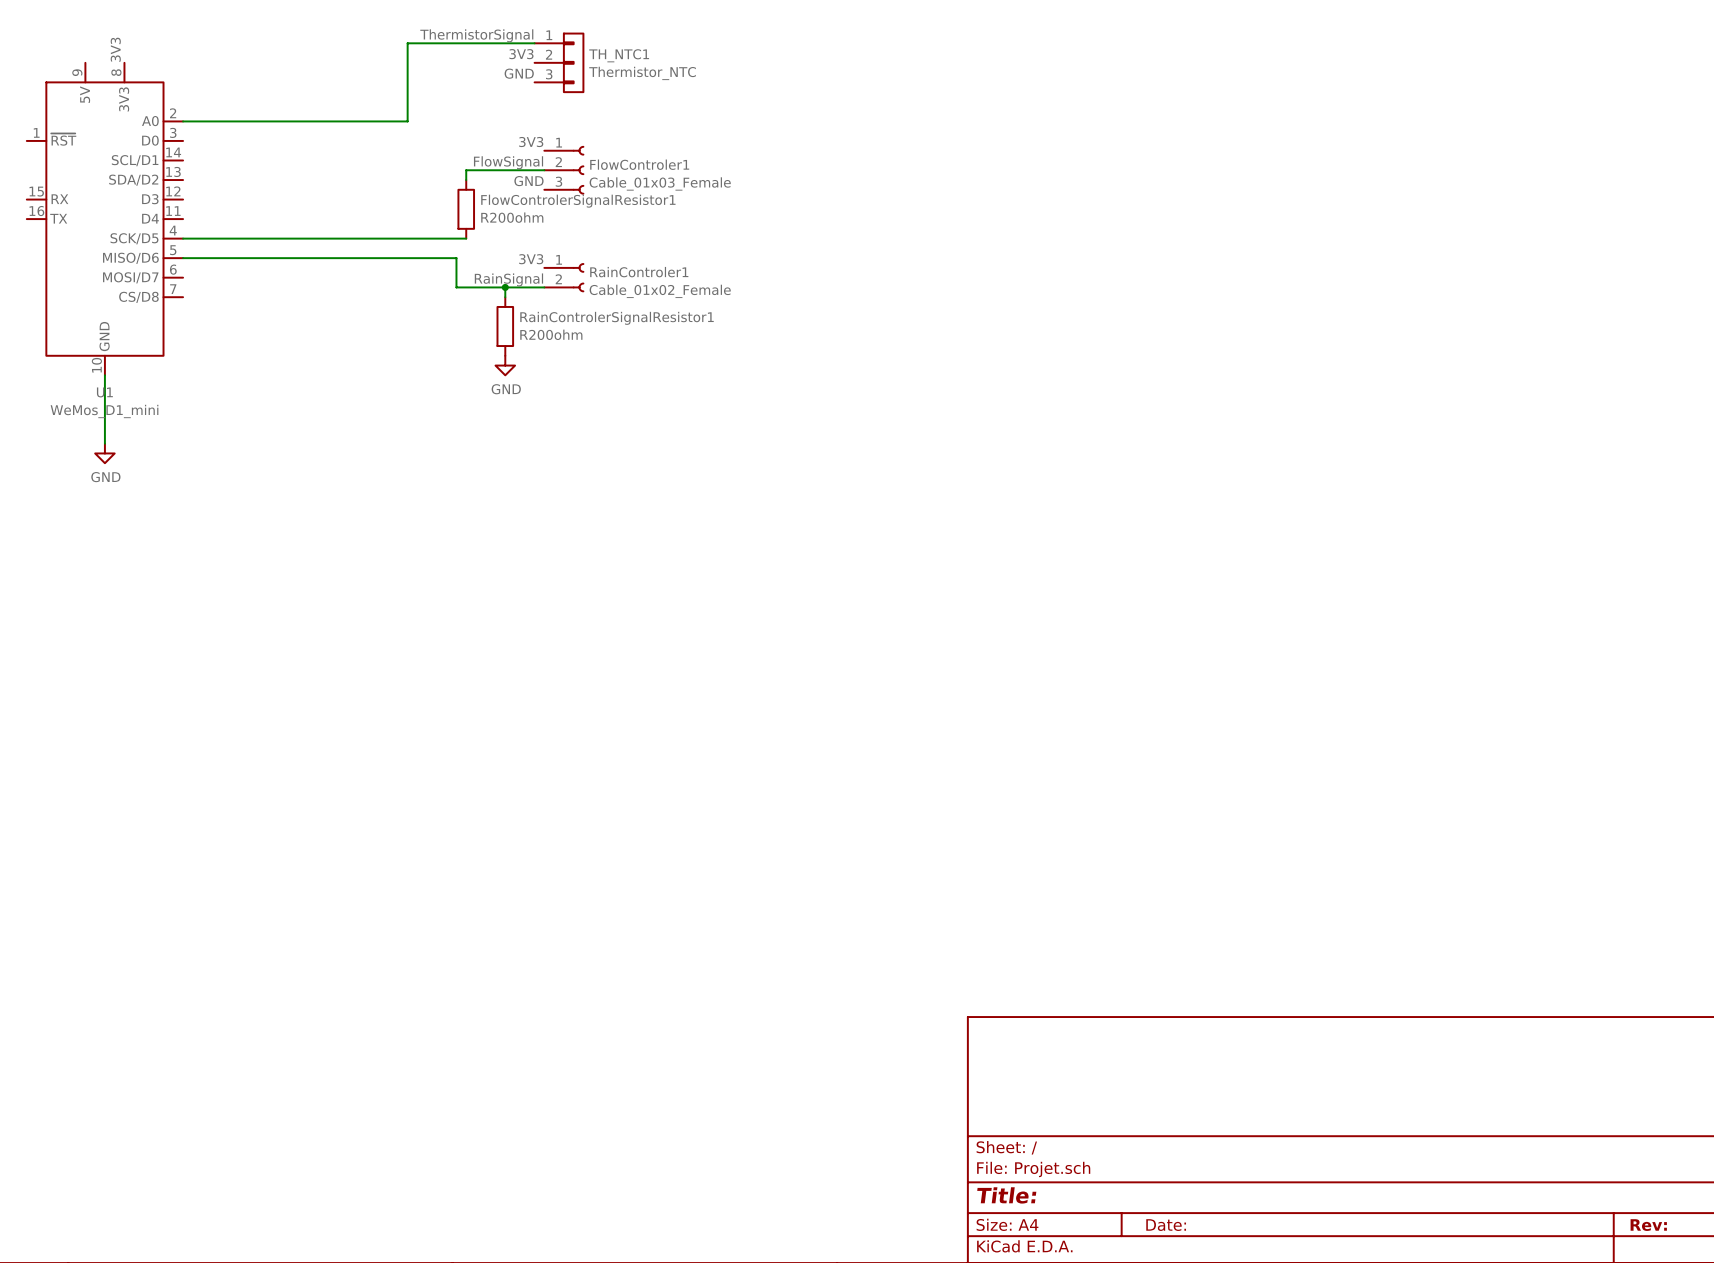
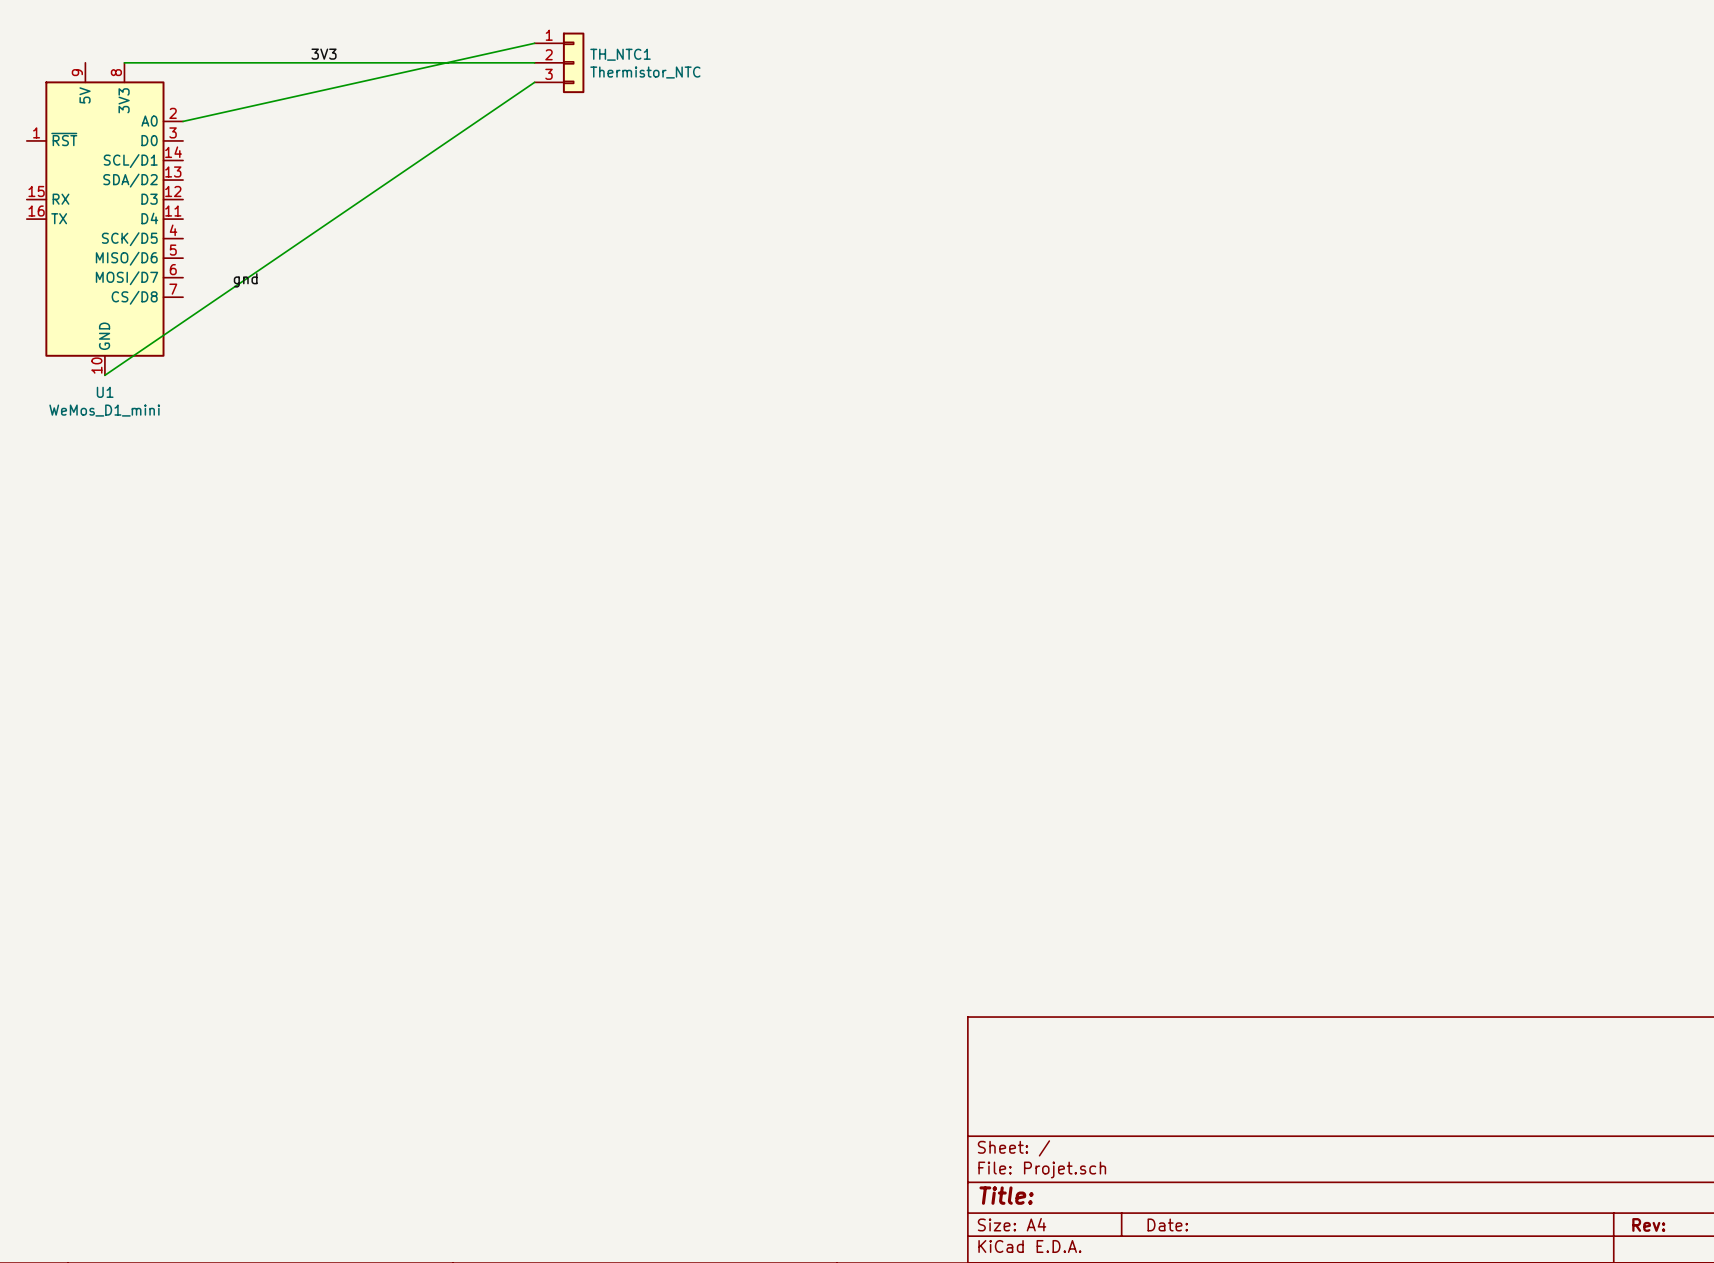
label: ThermistorSignal (476, 35) -> none
wire: (534, 43) (407, 43) (407, 121) (183, 121) -> (534, 43) (183, 121)
label: 3V3 (115, 49) -> none
label: none -> 3V3 (324, 54)
label: 3V3 (521, 54) -> none
wire: none -> (124, 62) (534, 62)
label: GND (519, 73) -> none
label: 3V3 (531, 142) -> none
label: FlowSignal (508, 162) -> none
wire: (544, 170) (466, 170) (466, 180) -> none
FlowControler1: Cable_01x03_Female (564, 170) -> none
label: GND (528, 181) -> none
FlowControlerSignalResistor1: R200ohm (466, 209) -> none
wire: (183, 238) (466, 238) -> none
wire: (183, 258) (456, 258) (456, 287) (544, 287) -> none
label: 3V3 (531, 259) -> none
RainControler1: Cable_01x02_Female (564, 277) -> none
label: none -> gnd (245, 280)
label: RainSignal (508, 279) -> none
wire: (505, 287) (505, 297) -> none
junction: (505, 287) -> none
RainControlerSignalResistor1: R200ohm (505, 326) -> none
power symbol: GND (505, 365) -> none
wire: (104, 375) (104, 443) -> (104, 375) (534, 82)
power symbol: GND (104, 453) -> none

